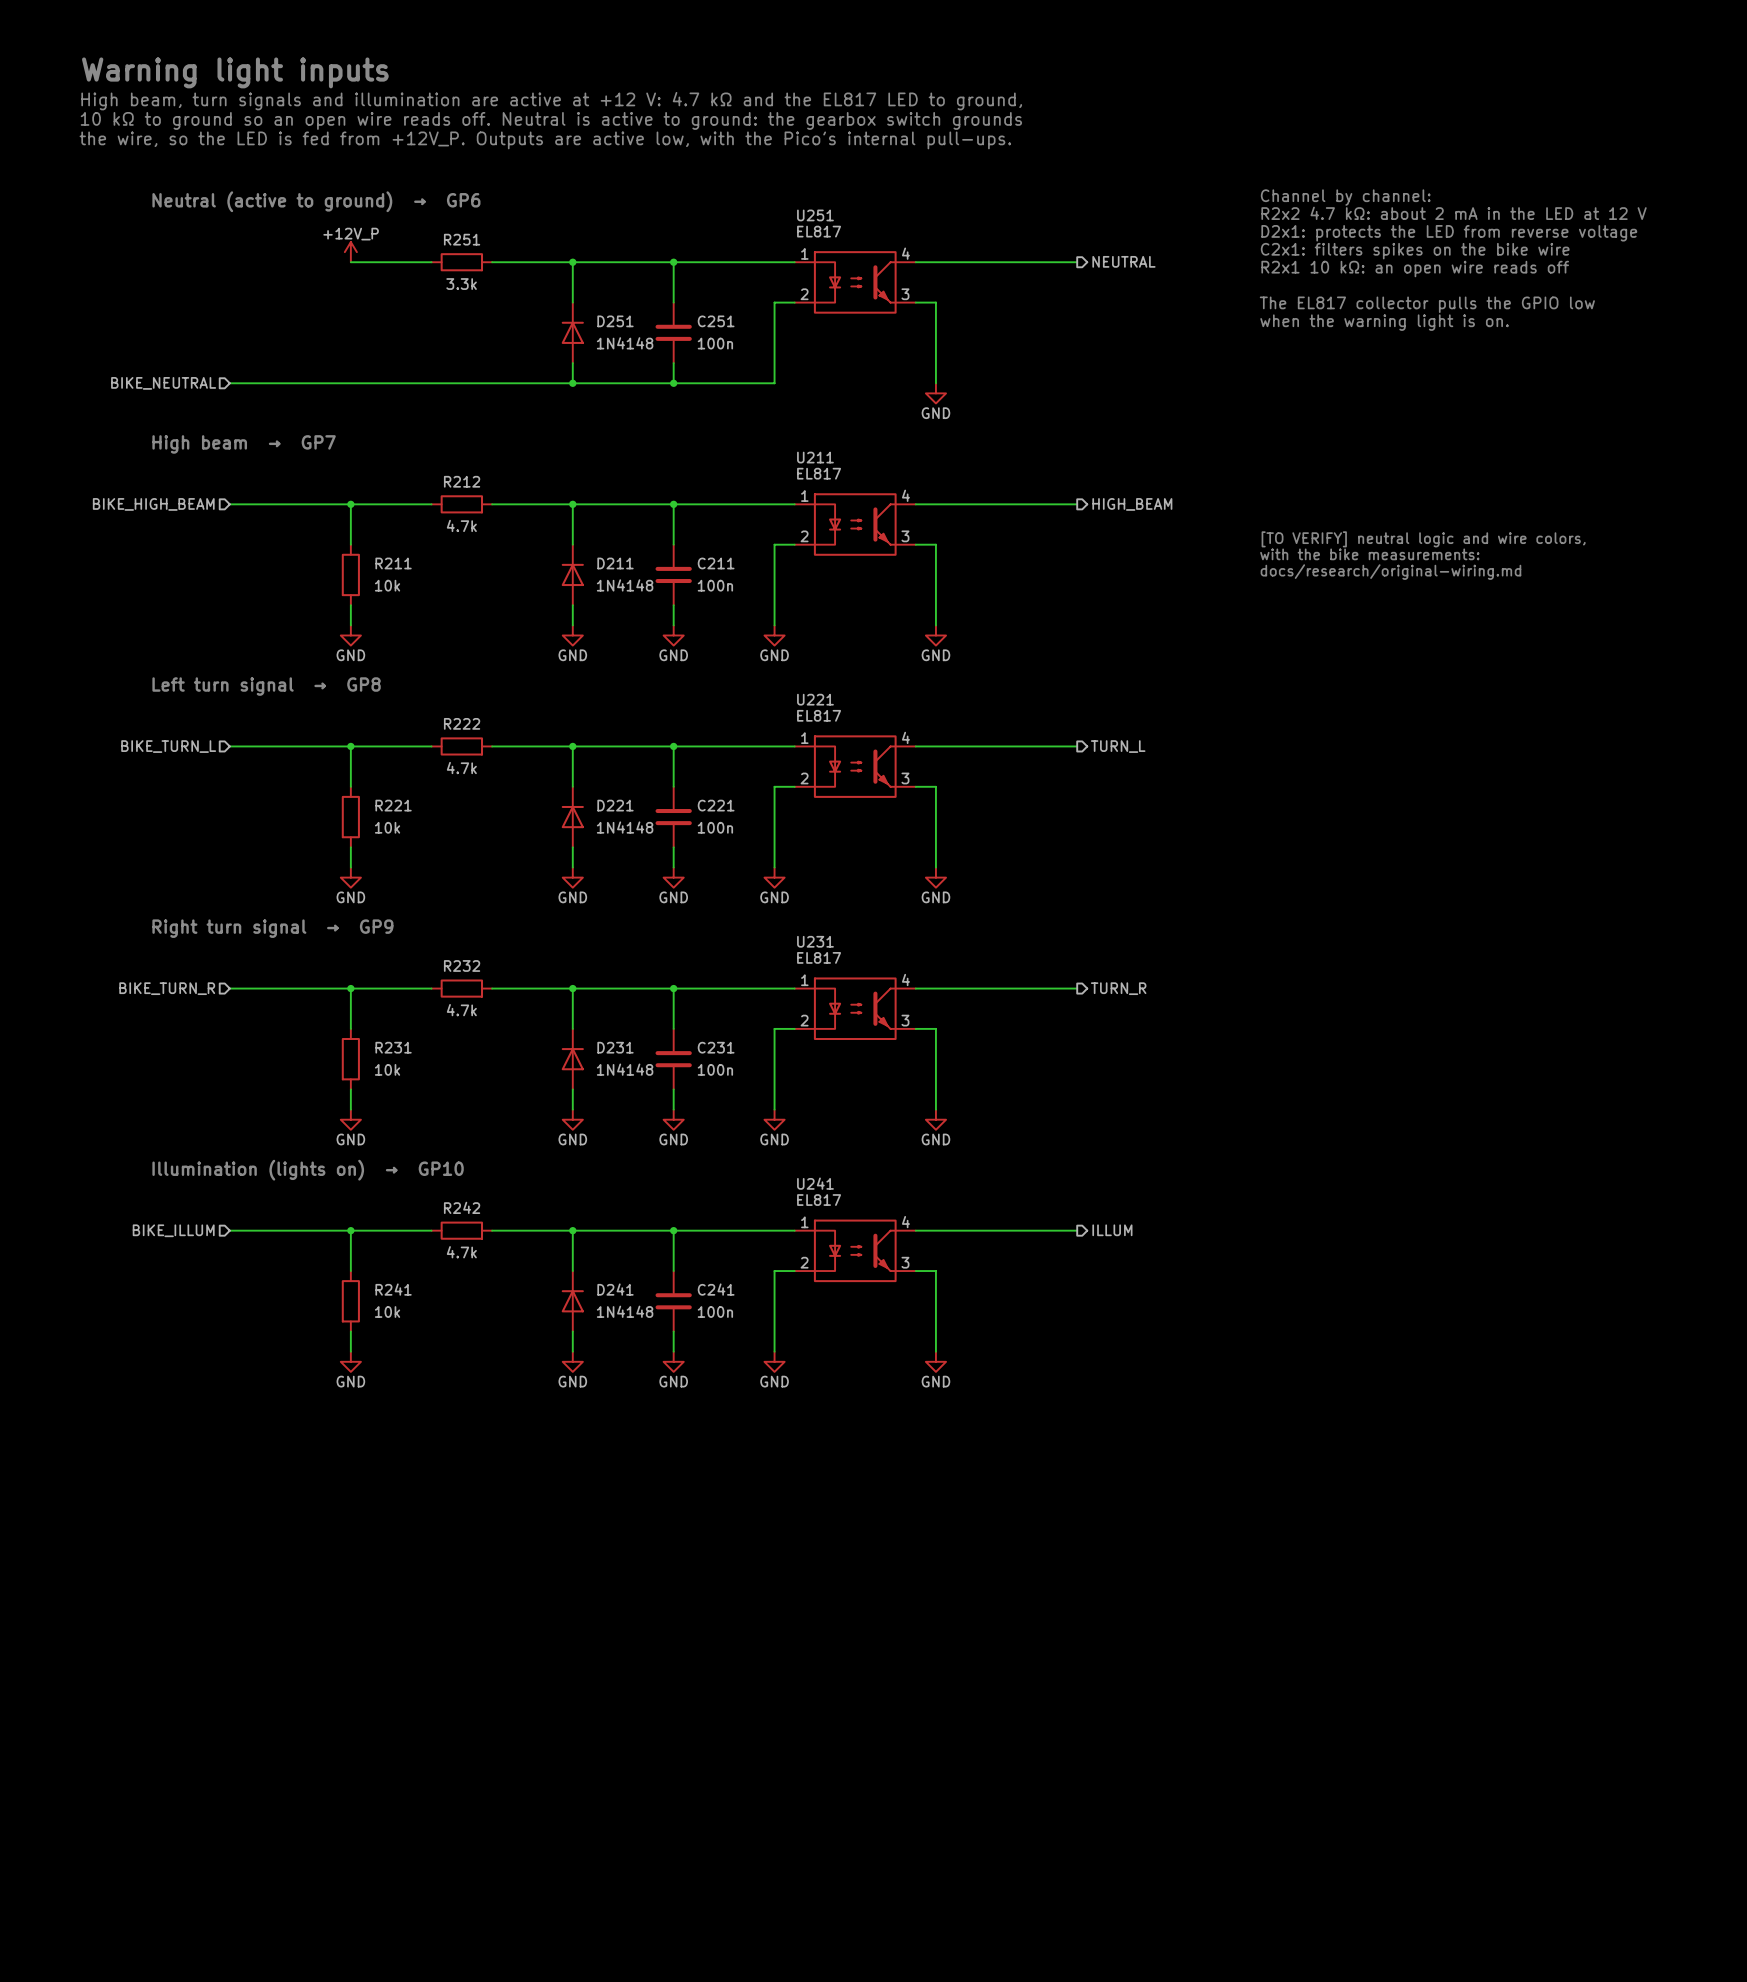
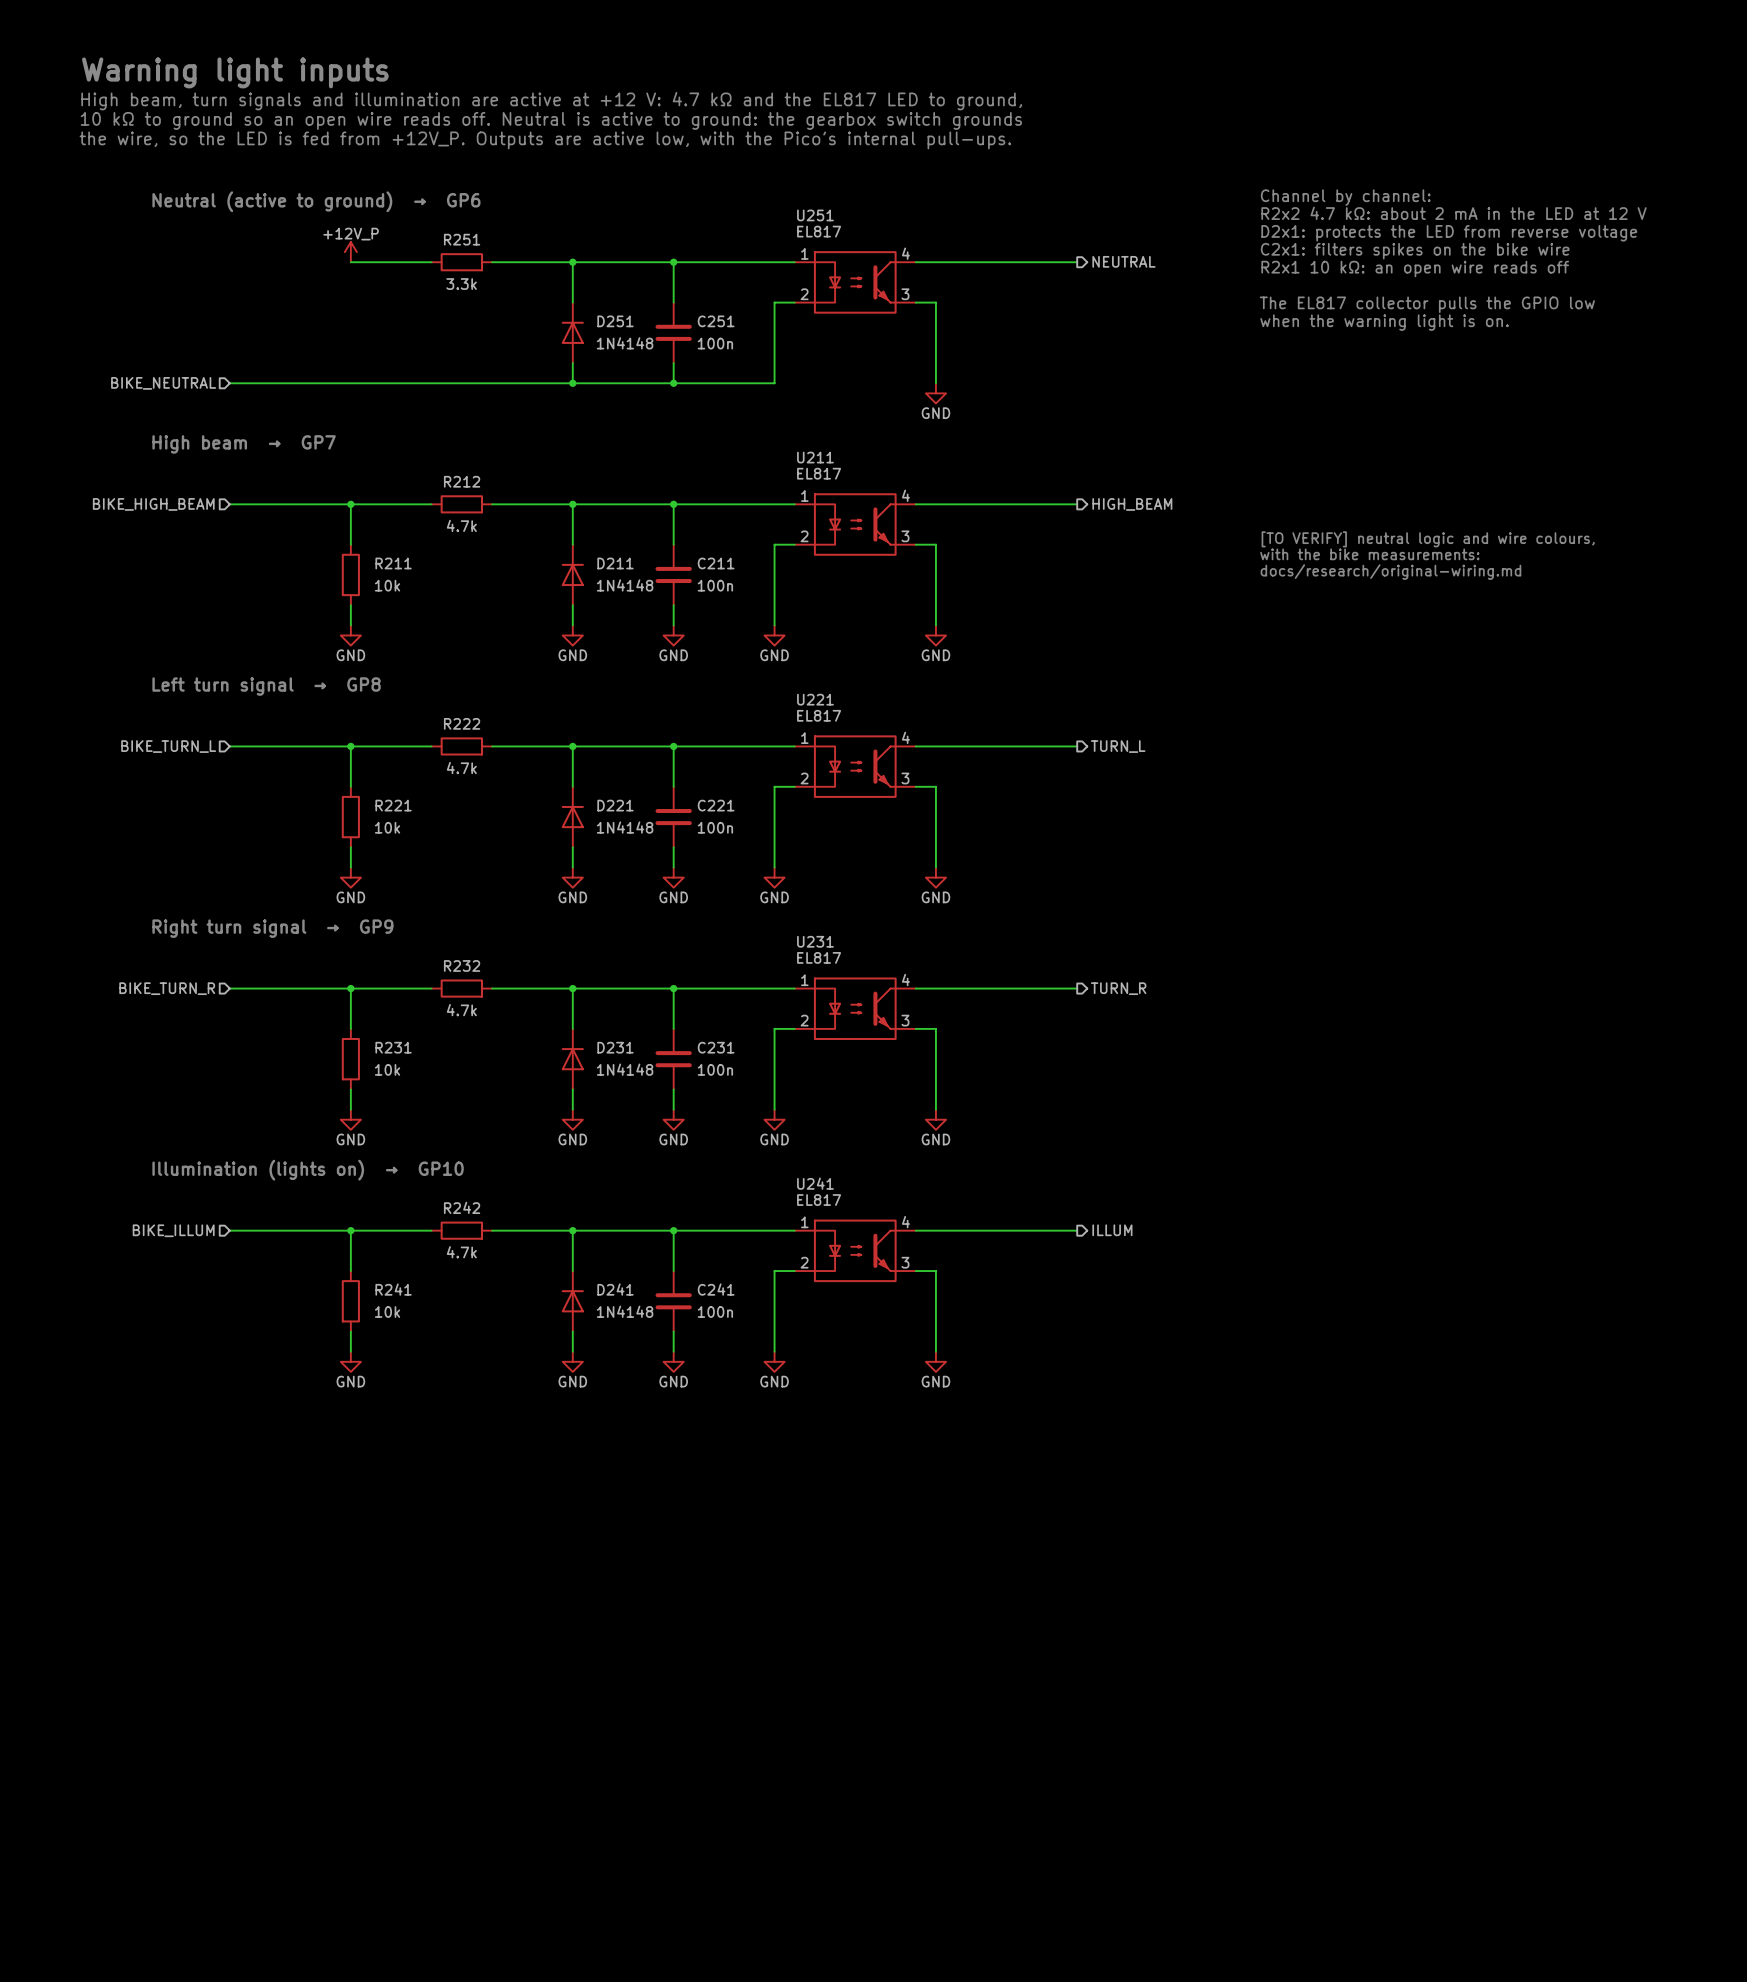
text: [TO VERIFY] neutral logic and wire colors, (1423, 539) -> [TO VERIFY] neutral logic and wire colours, (1428, 539)

